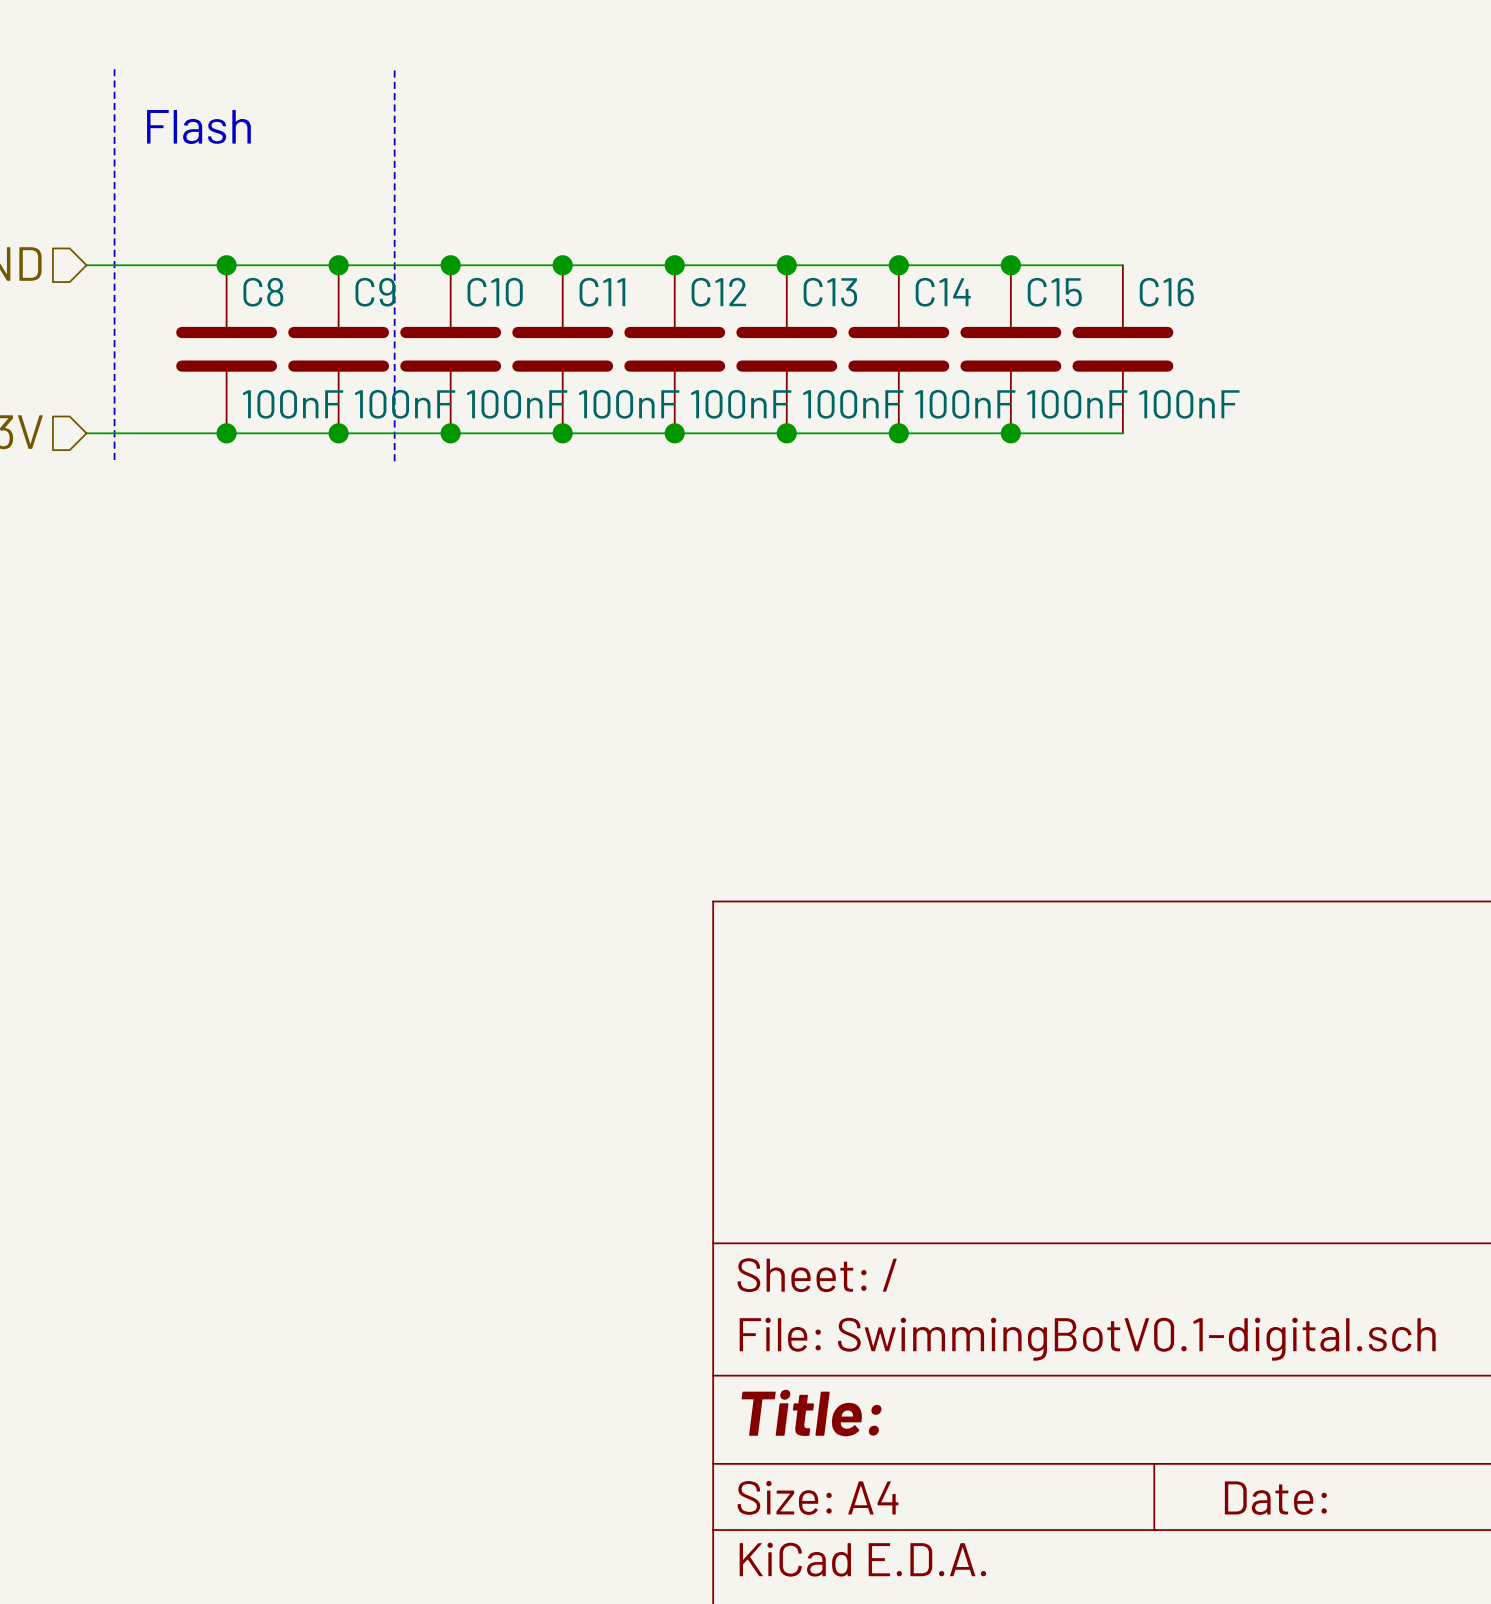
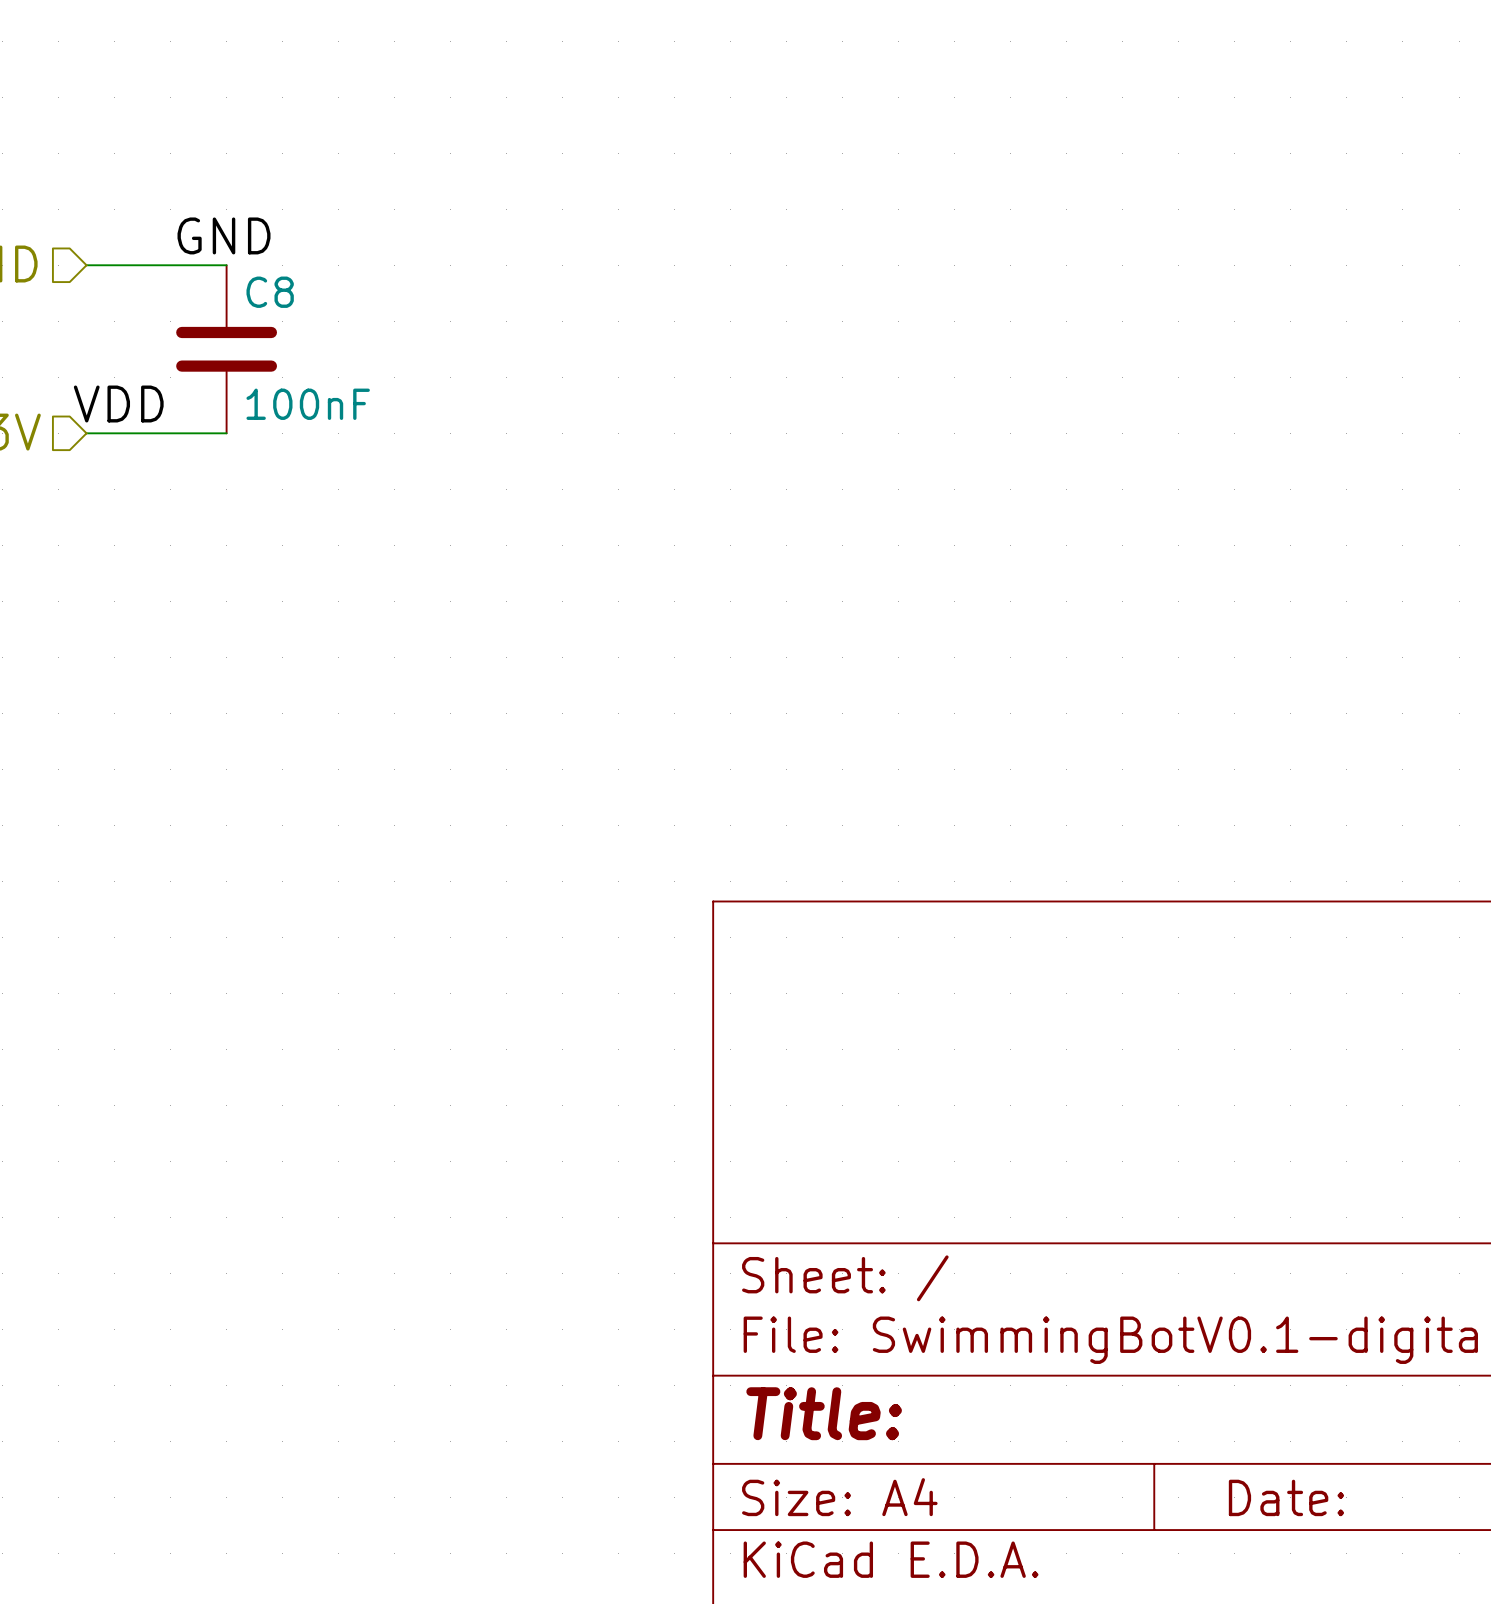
line: (114, 69) (114, 461) -> none
line: (394, 69) (394, 461) -> none
text: Flash (198, 126) -> none
label: none -> GND (224, 235)
wire: (226, 265) (1122, 265) -> none
junction: (226, 265) -> none
junction: (338, 265) -> none
junction: (450, 265) -> none
junction: (562, 265) -> none
junction: (674, 265) -> none
junction: (786, 265) -> none
junction: (898, 265) -> none
junction: (1010, 265) -> none
C9: 100nF (338, 349) -> none
C10: 100nF (450, 349) -> none
C11: 100nF (562, 349) -> none
C12: 100nF (674, 349) -> none
C13: 100nF (786, 349) -> none
C14: 100nF (898, 349) -> none
C15: 100nF (1010, 349) -> none
C16: 100nF (1122, 349) -> none
label: none -> VDD (118, 404)
wire: (226, 433) (1122, 433) -> none
junction: (226, 433) -> none
junction: (338, 433) -> none
junction: (450, 433) -> none
junction: (562, 433) -> none
junction: (674, 433) -> none
junction: (786, 433) -> none
junction: (898, 433) -> none
junction: (1010, 433) -> none

